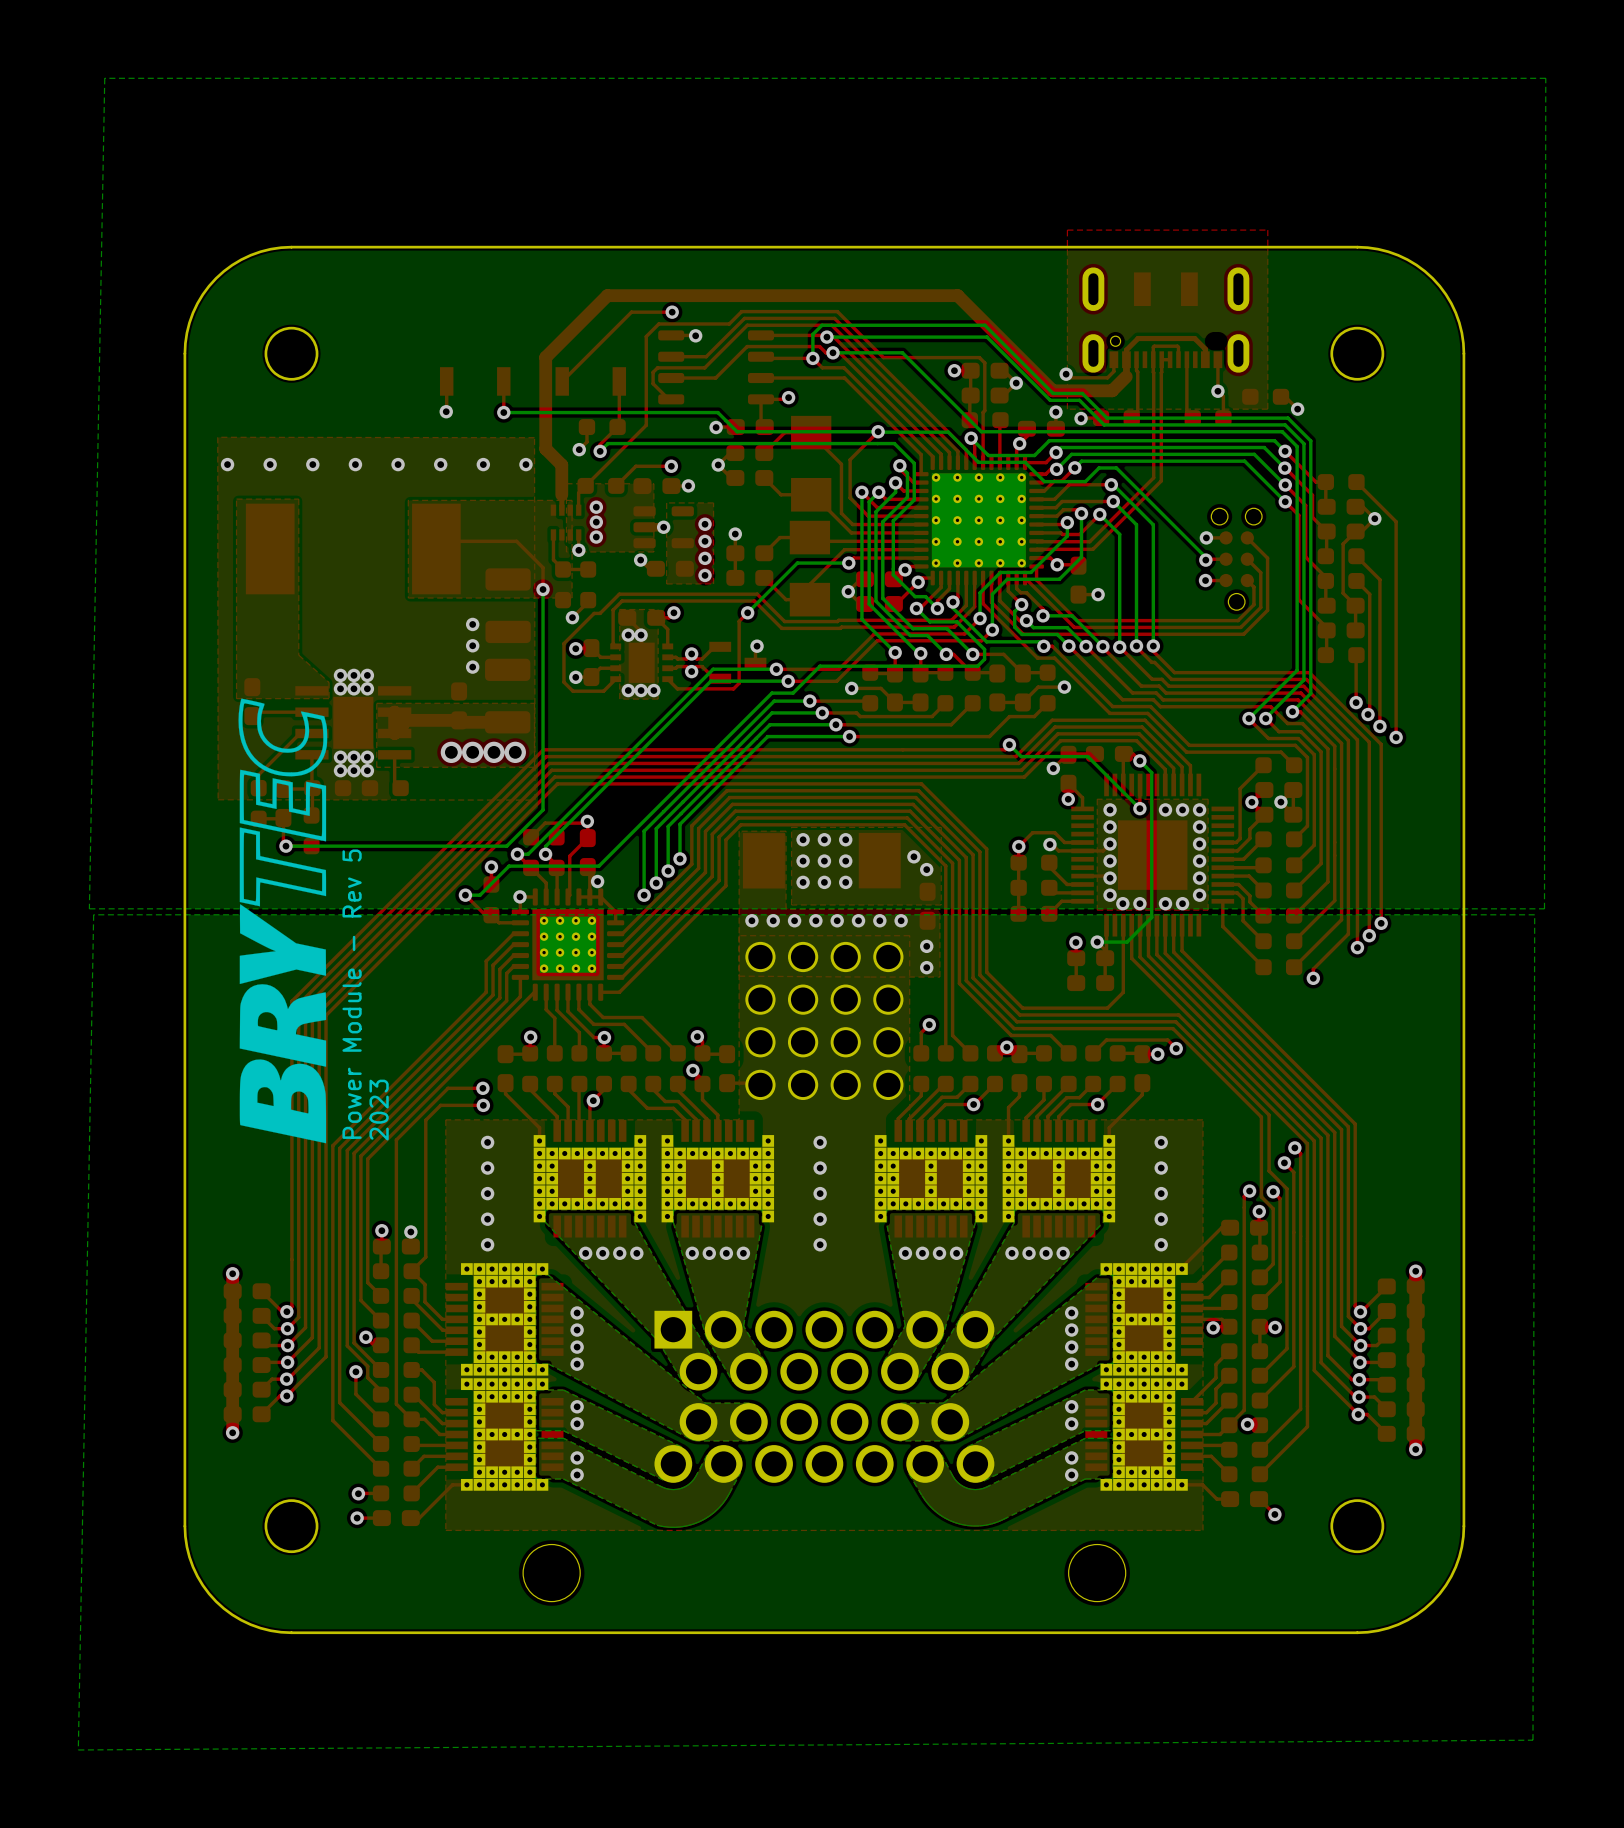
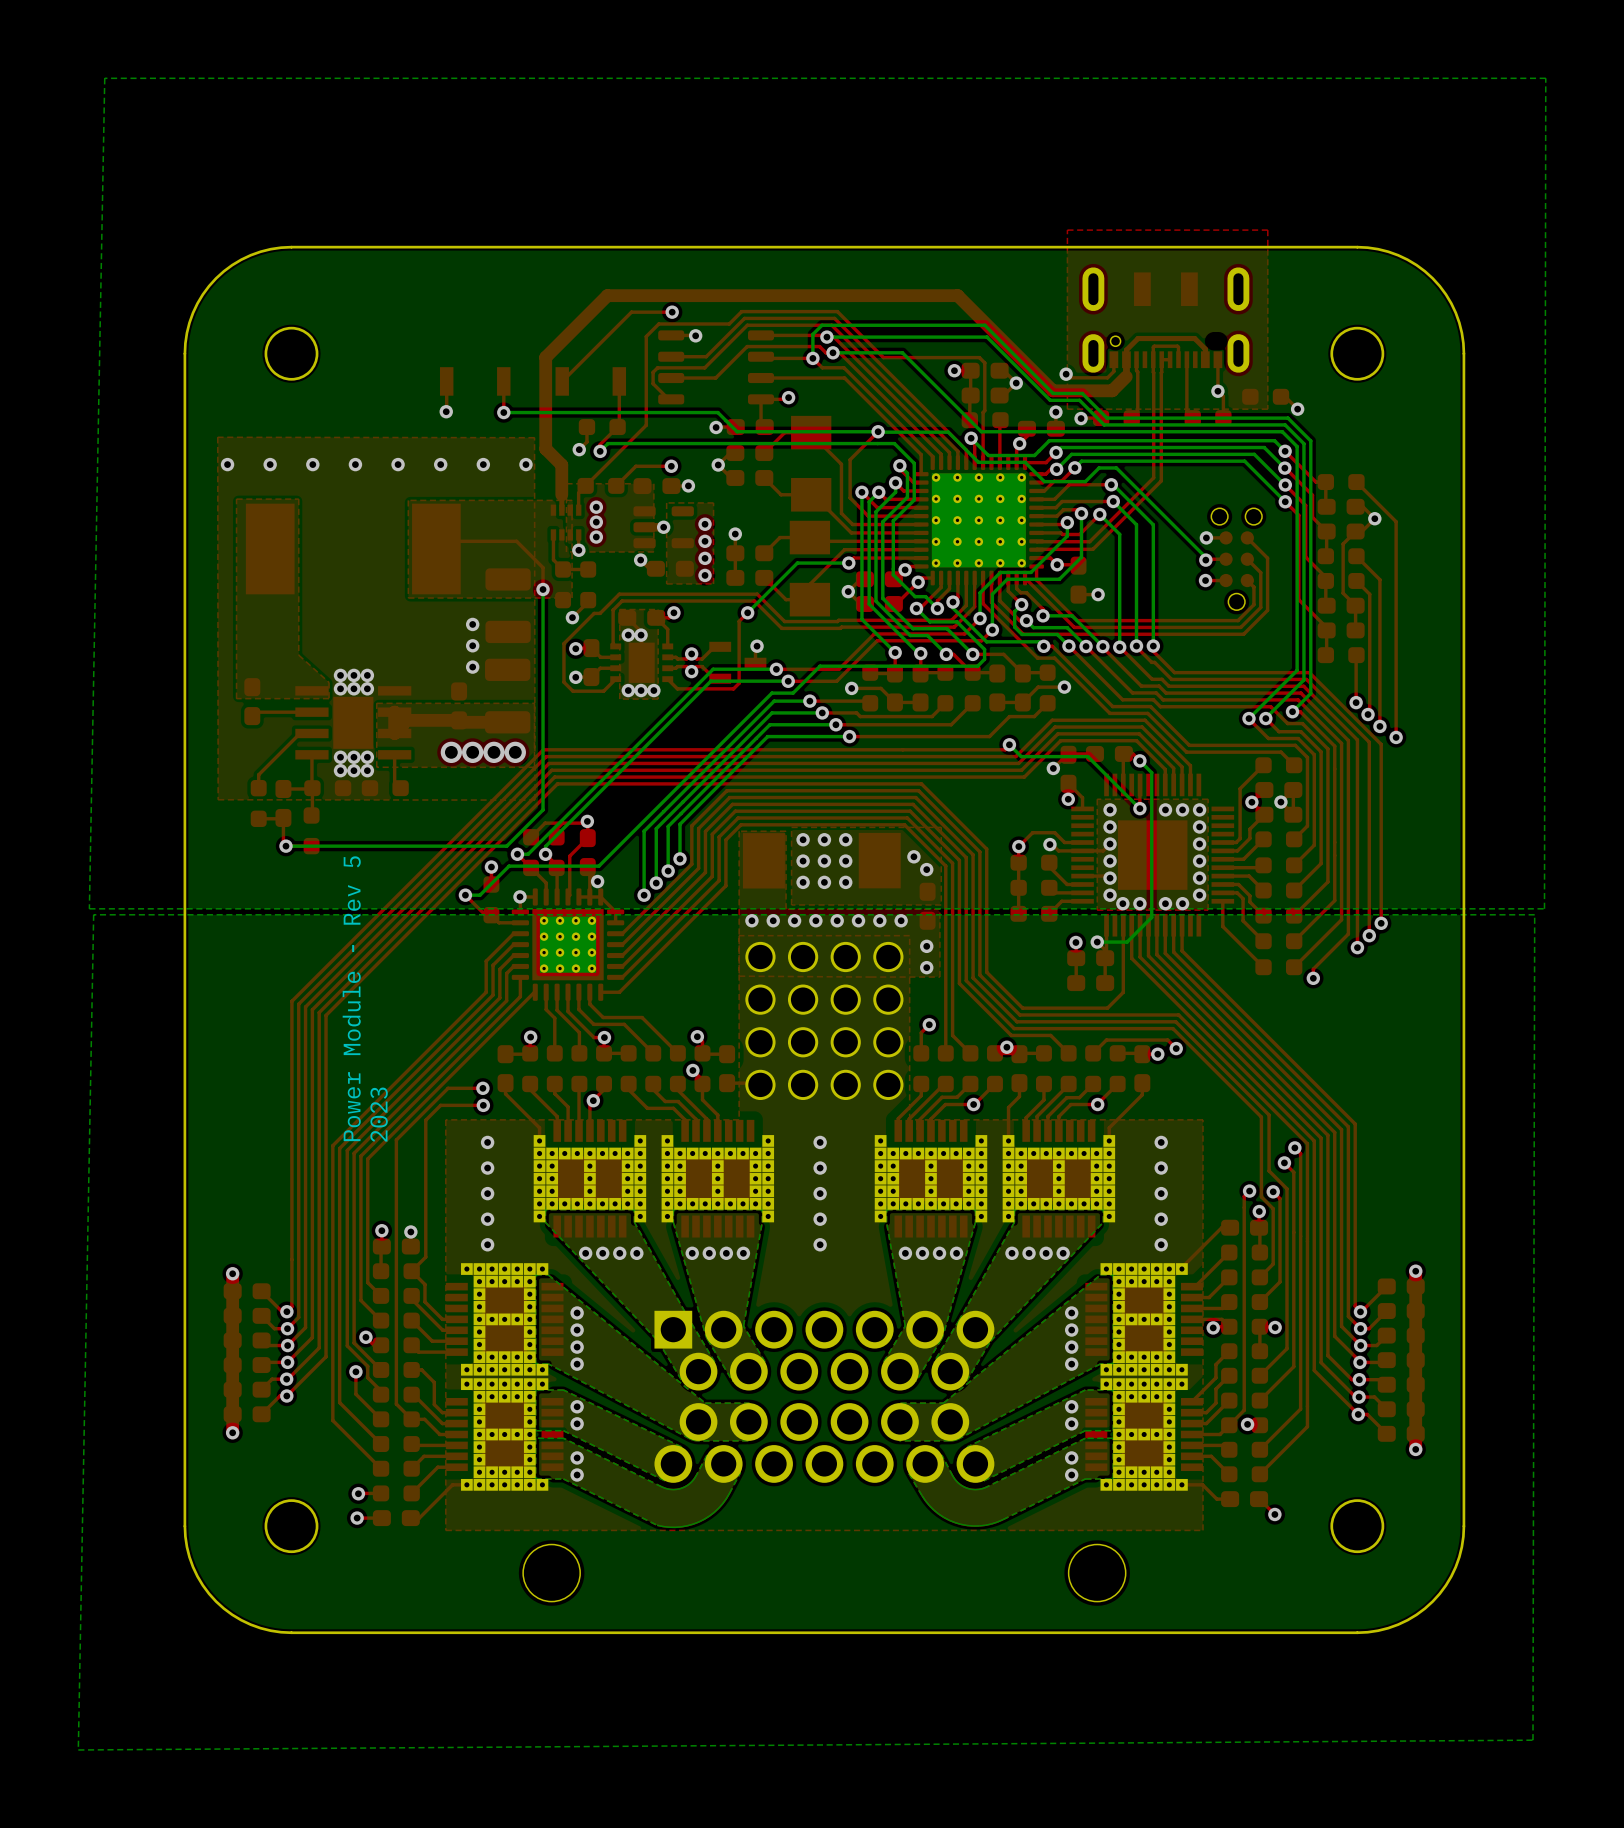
drawing: [238, 698, 328, 1144] -> none

